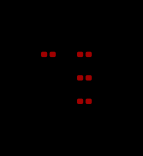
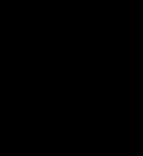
part: (48, 54) -> none
part: (84, 54) -> none
part: (84, 77) -> none
part: (84, 101) -> none

